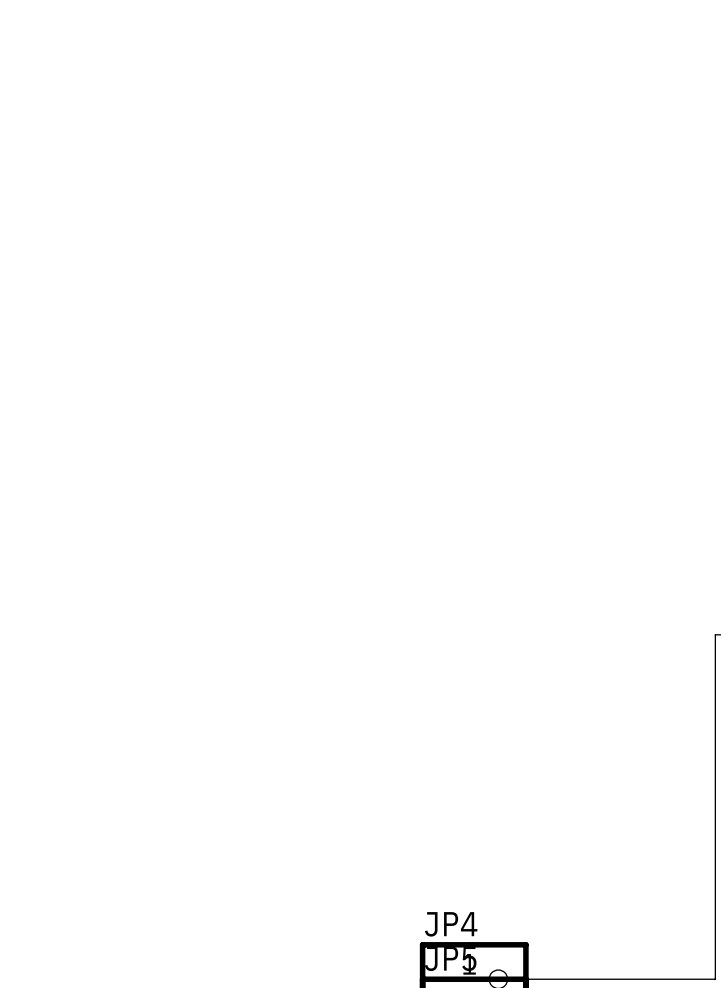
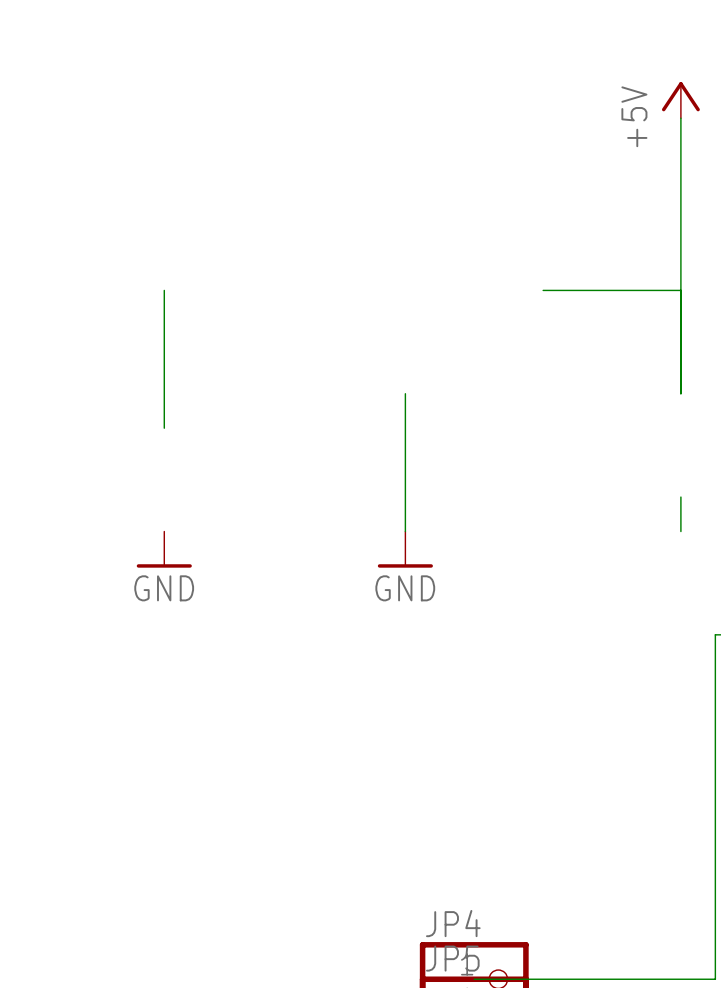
power symbol: none -> +5V (680, 100)
wire: none -> (680, 118) (680, 393)
wire: none -> (164, 290) (164, 428)
wire: none -> (543, 290) (680, 290)
wire: none -> (405, 393) (405, 531)
wire: none -> (680, 497) (680, 531)
power symbol: none -> GND (164, 549)
power symbol: none -> GND (405, 549)

